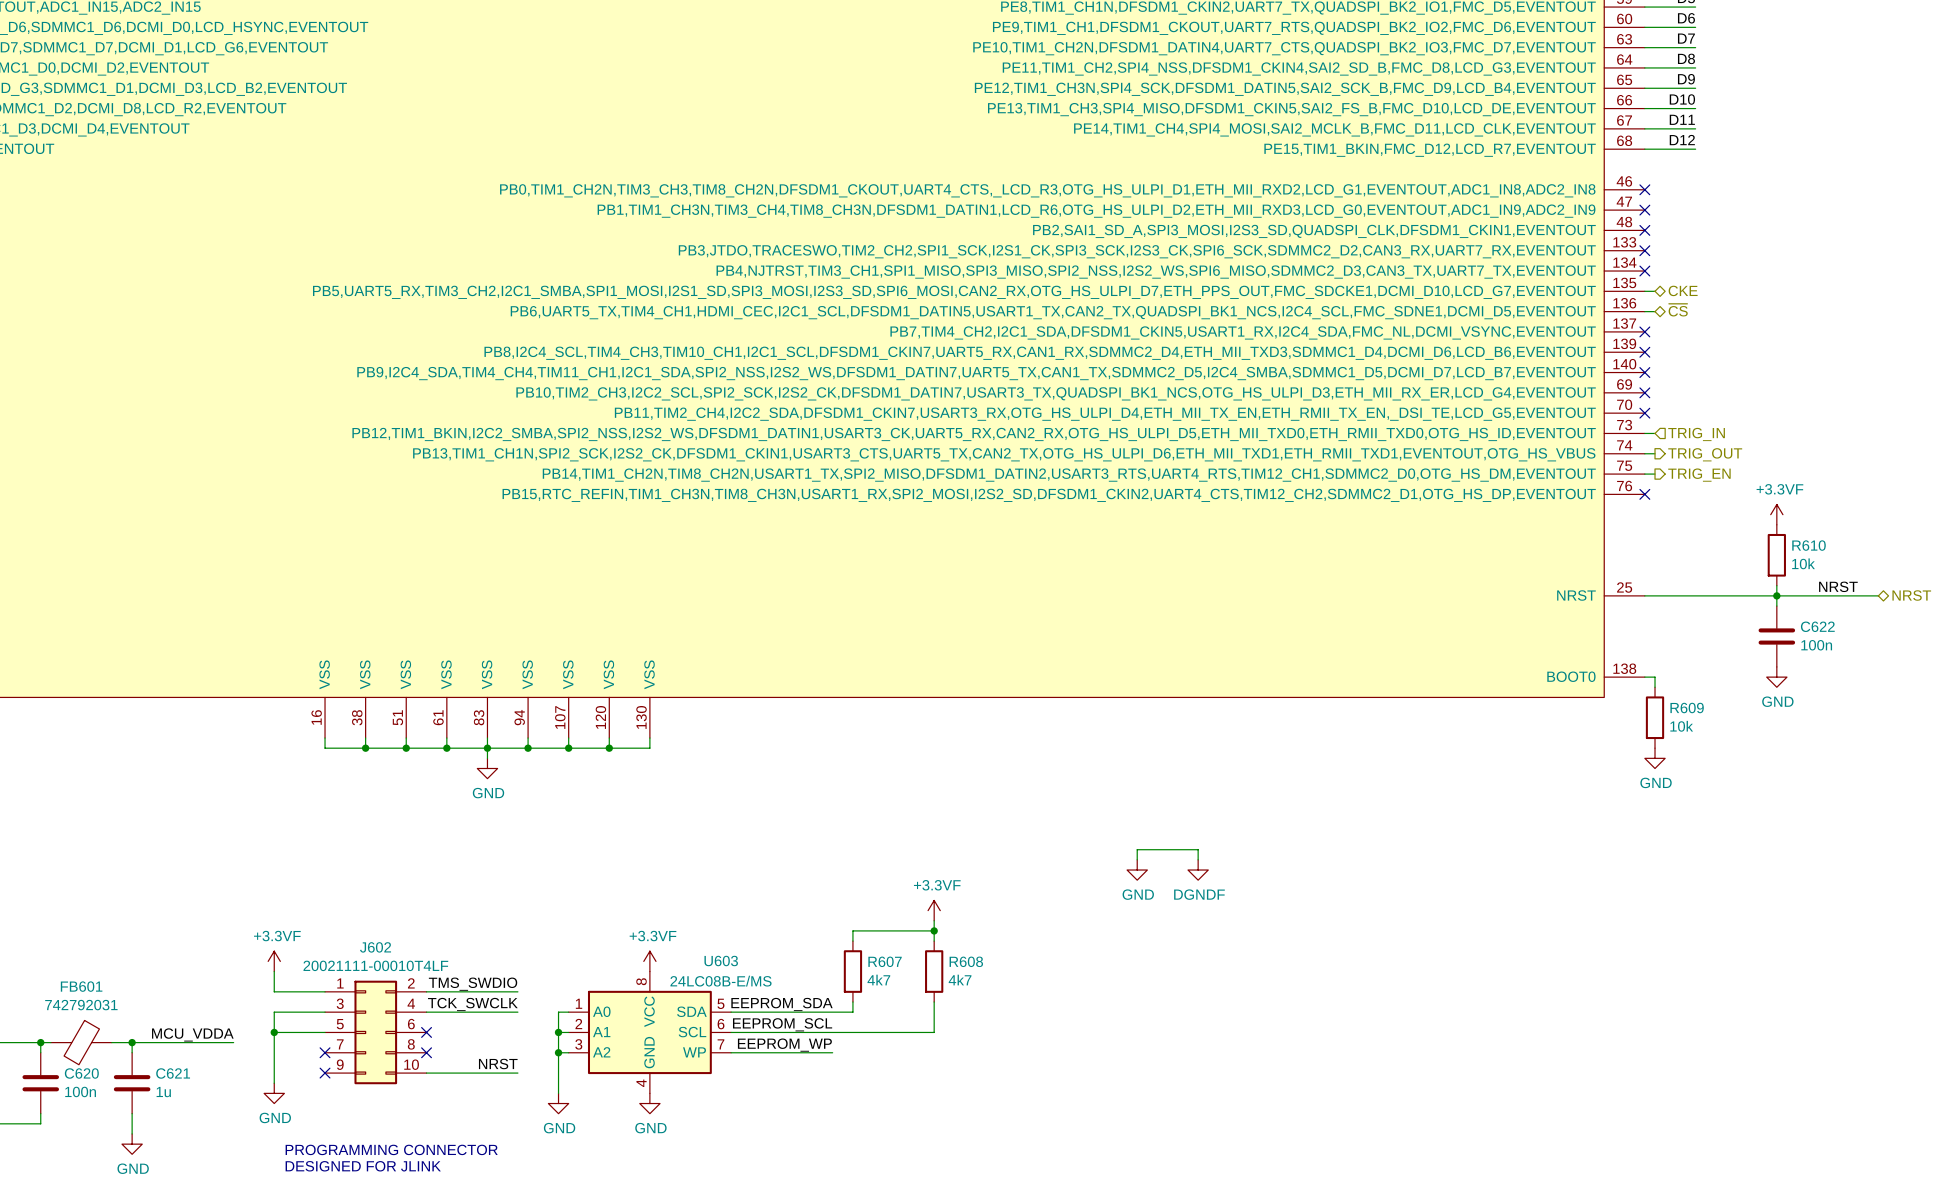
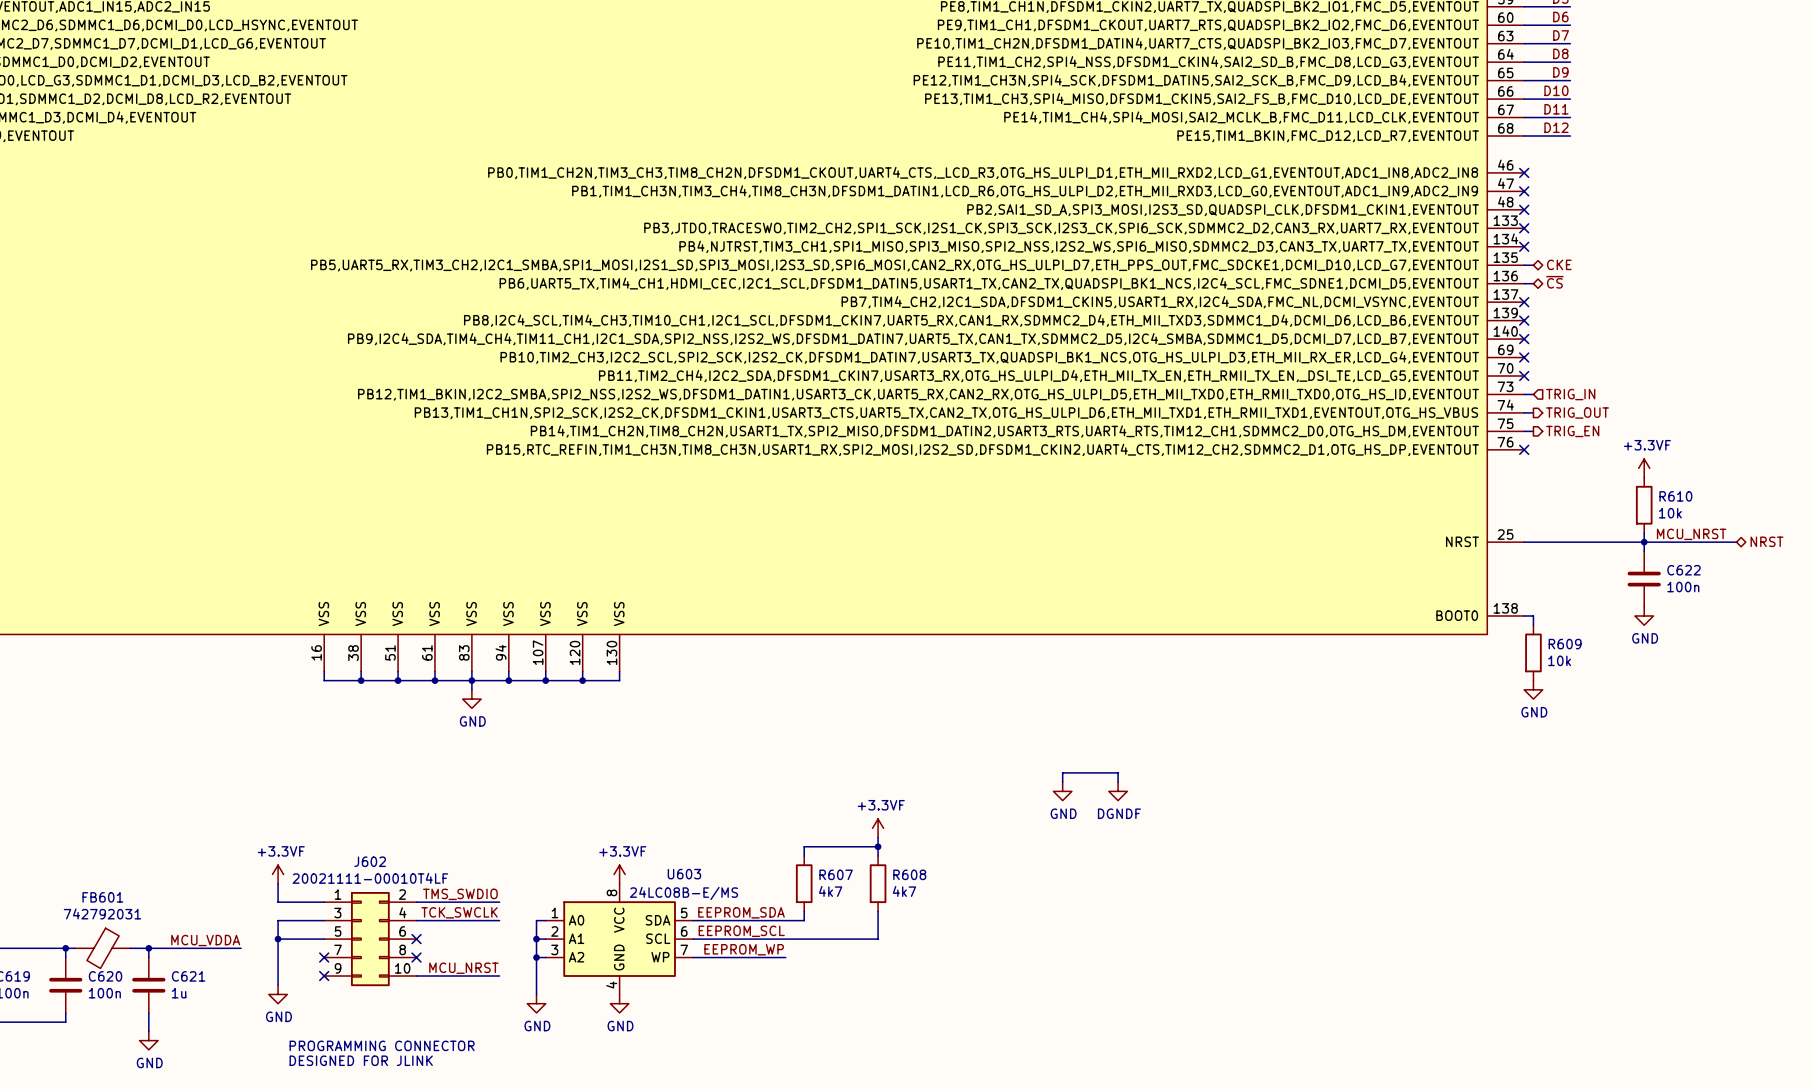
label: NRST (1838, 586) -> MCU_NRST (1691, 534)
label: NRST (498, 1064) -> MCU_NRST (463, 968)

